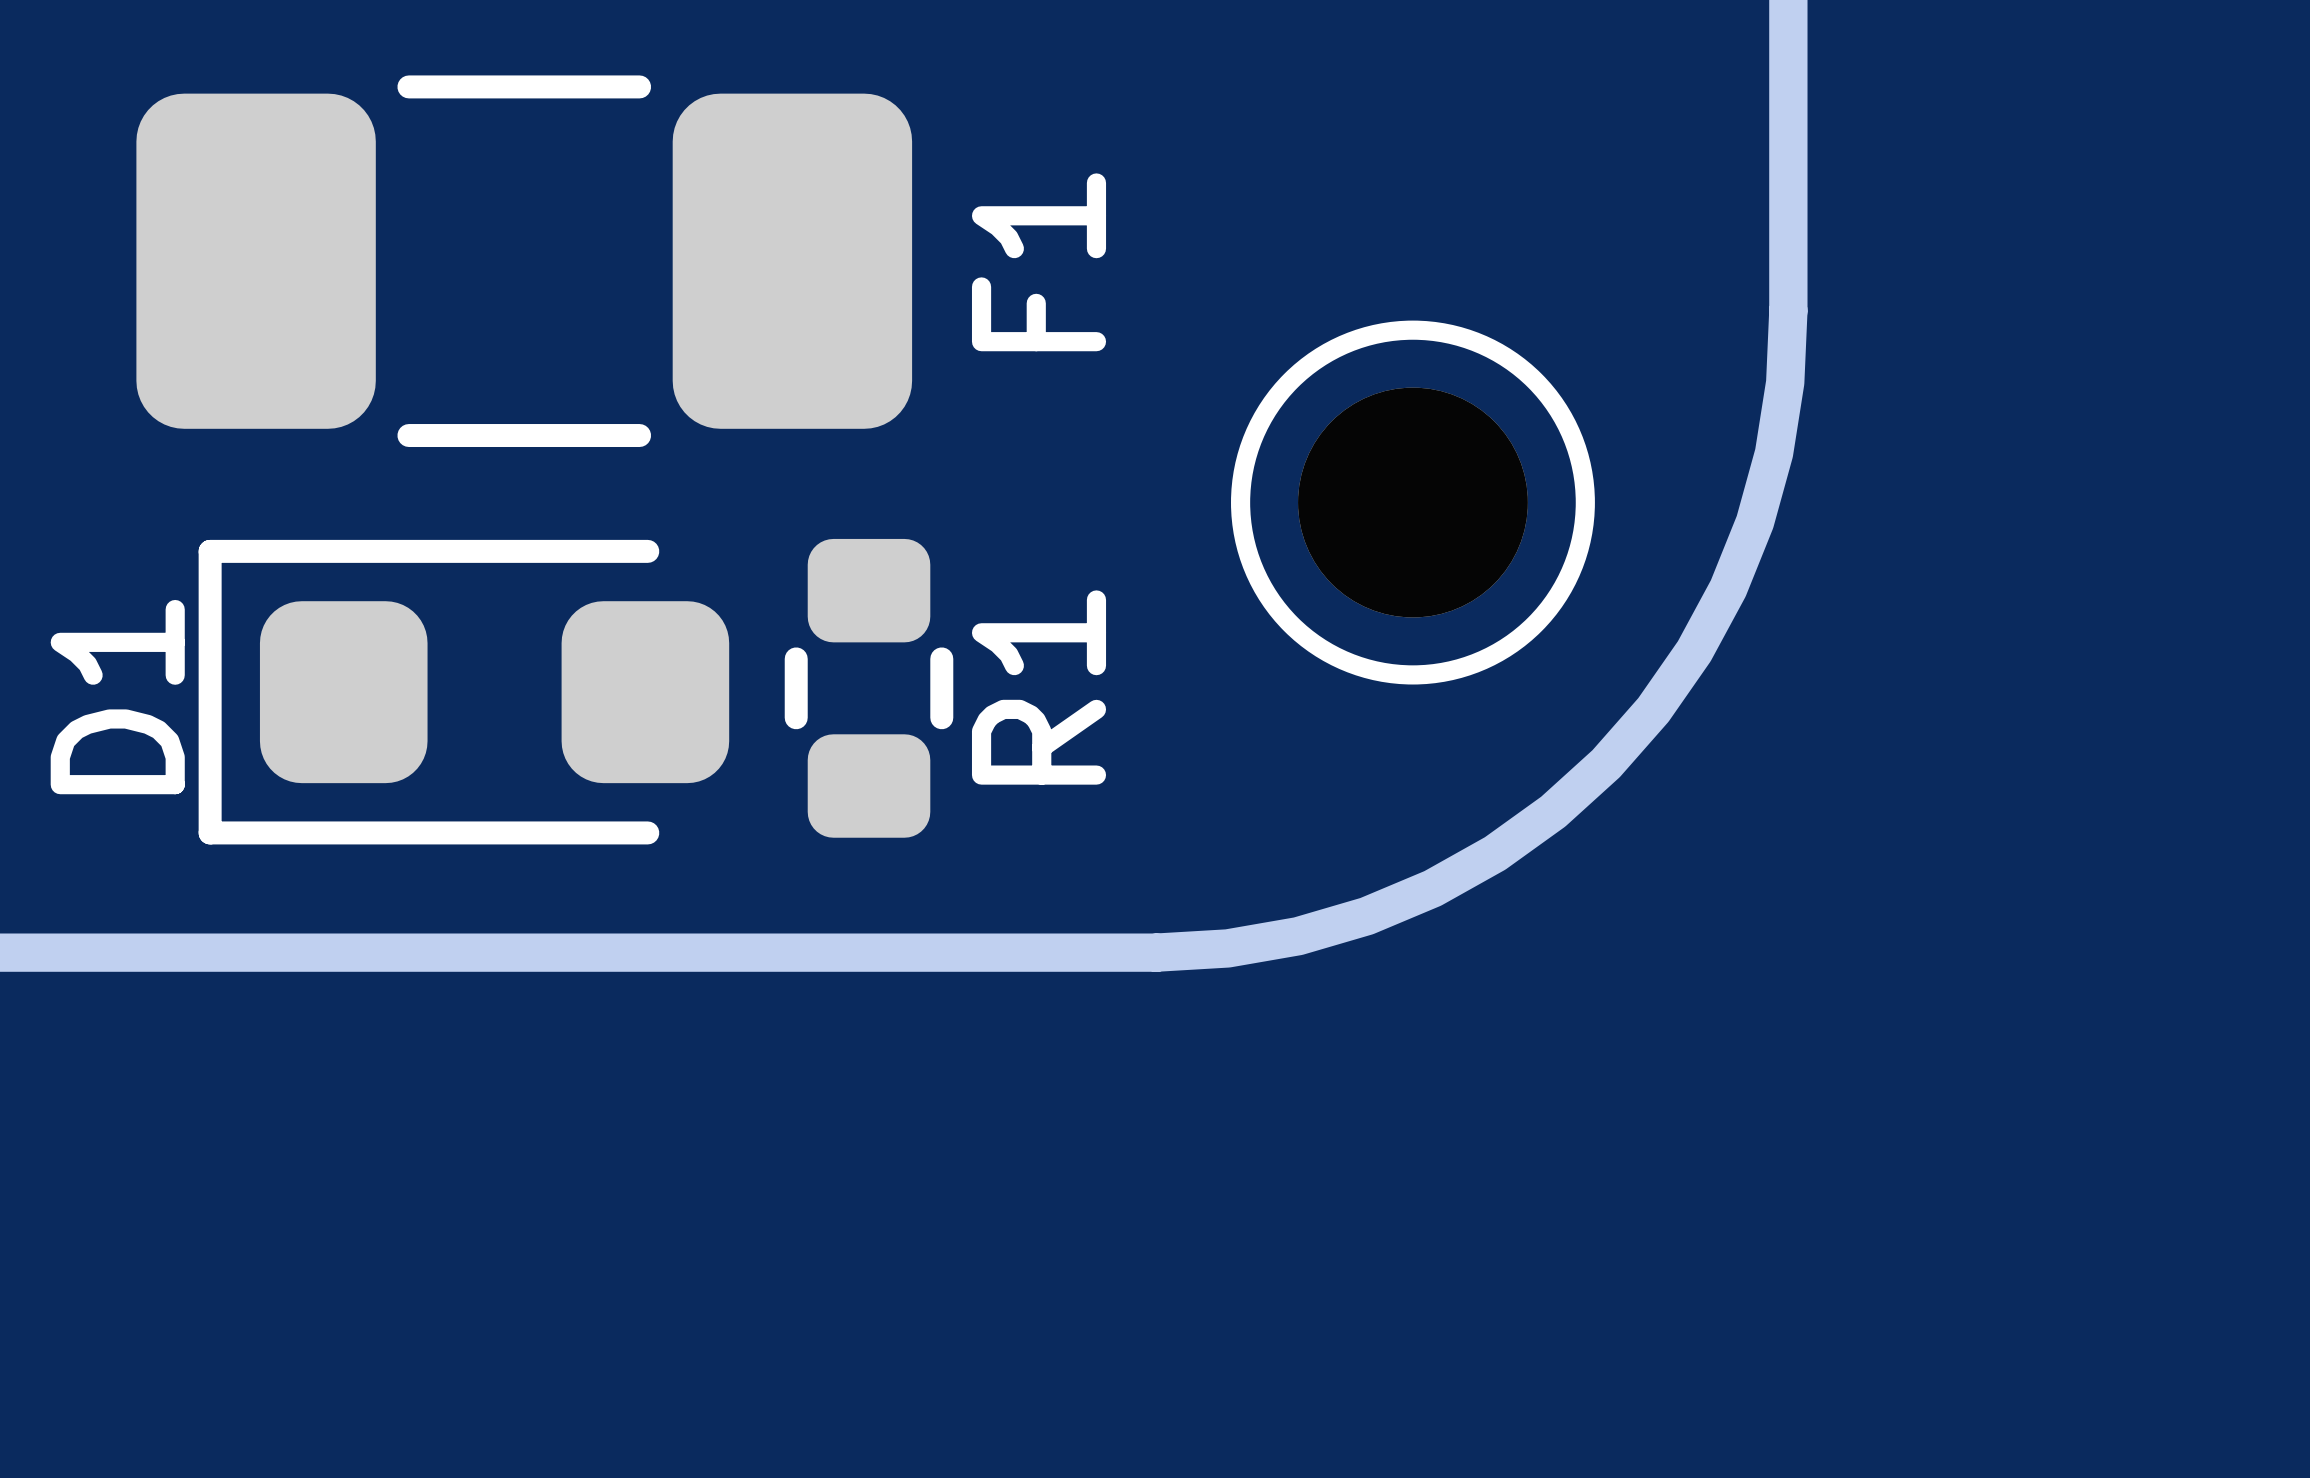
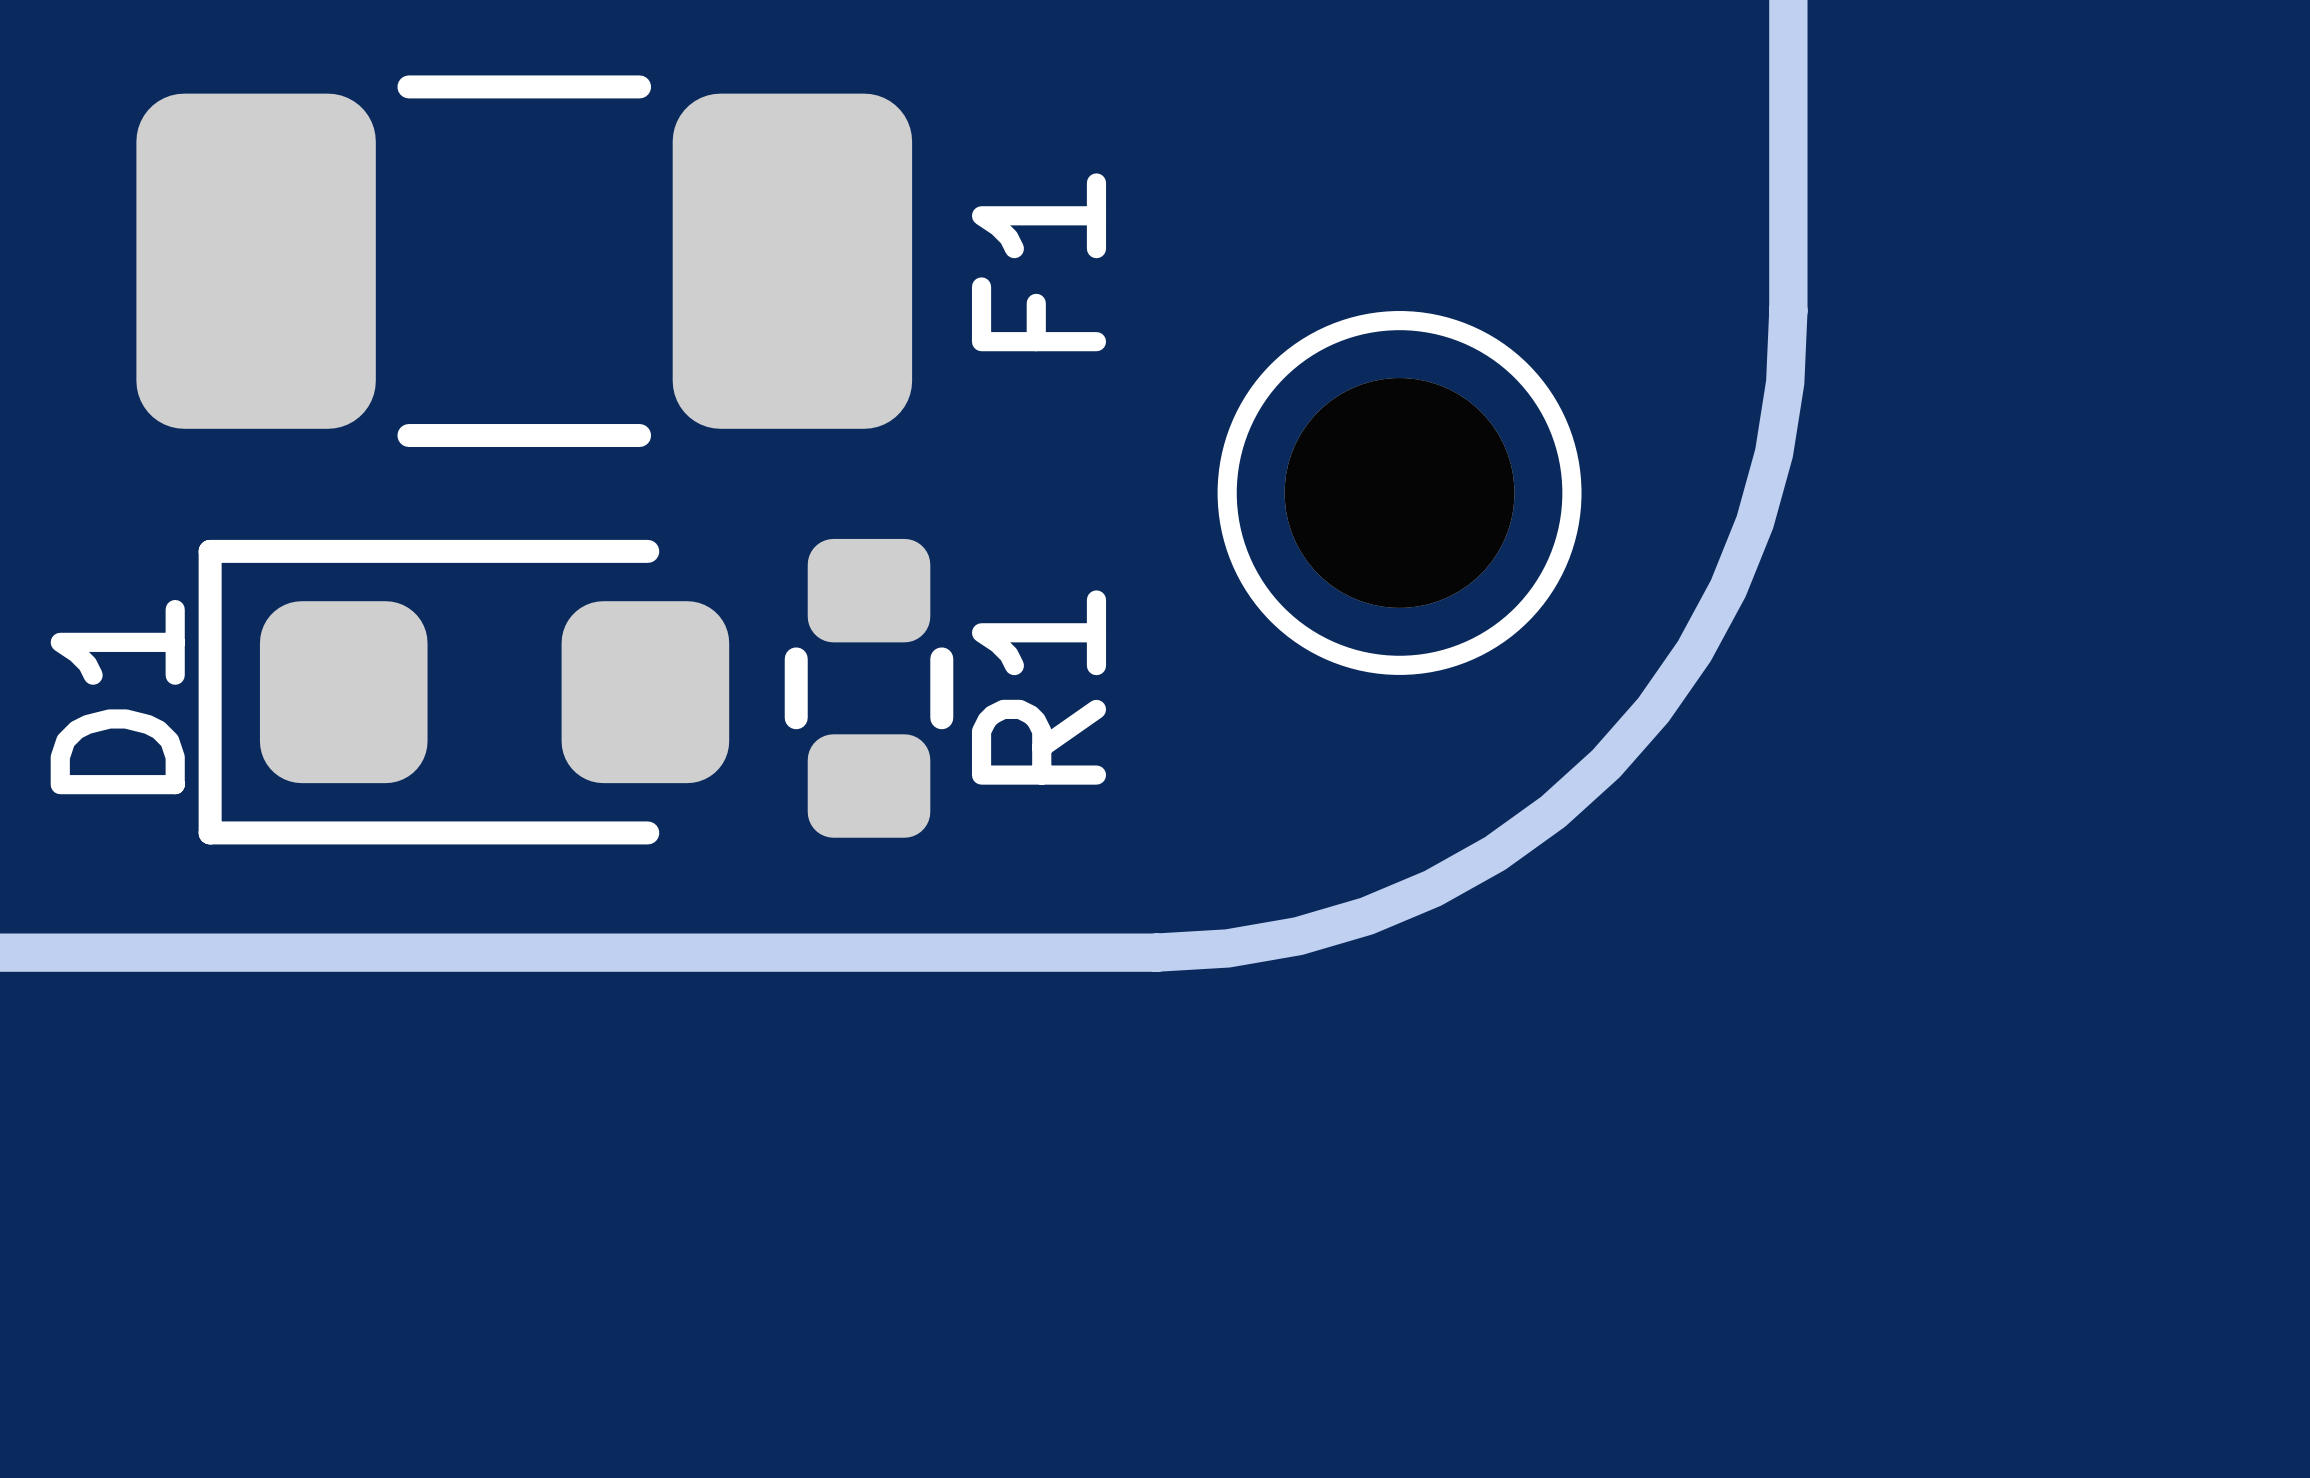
part position: (1412, 502) -> (1399, 492)

